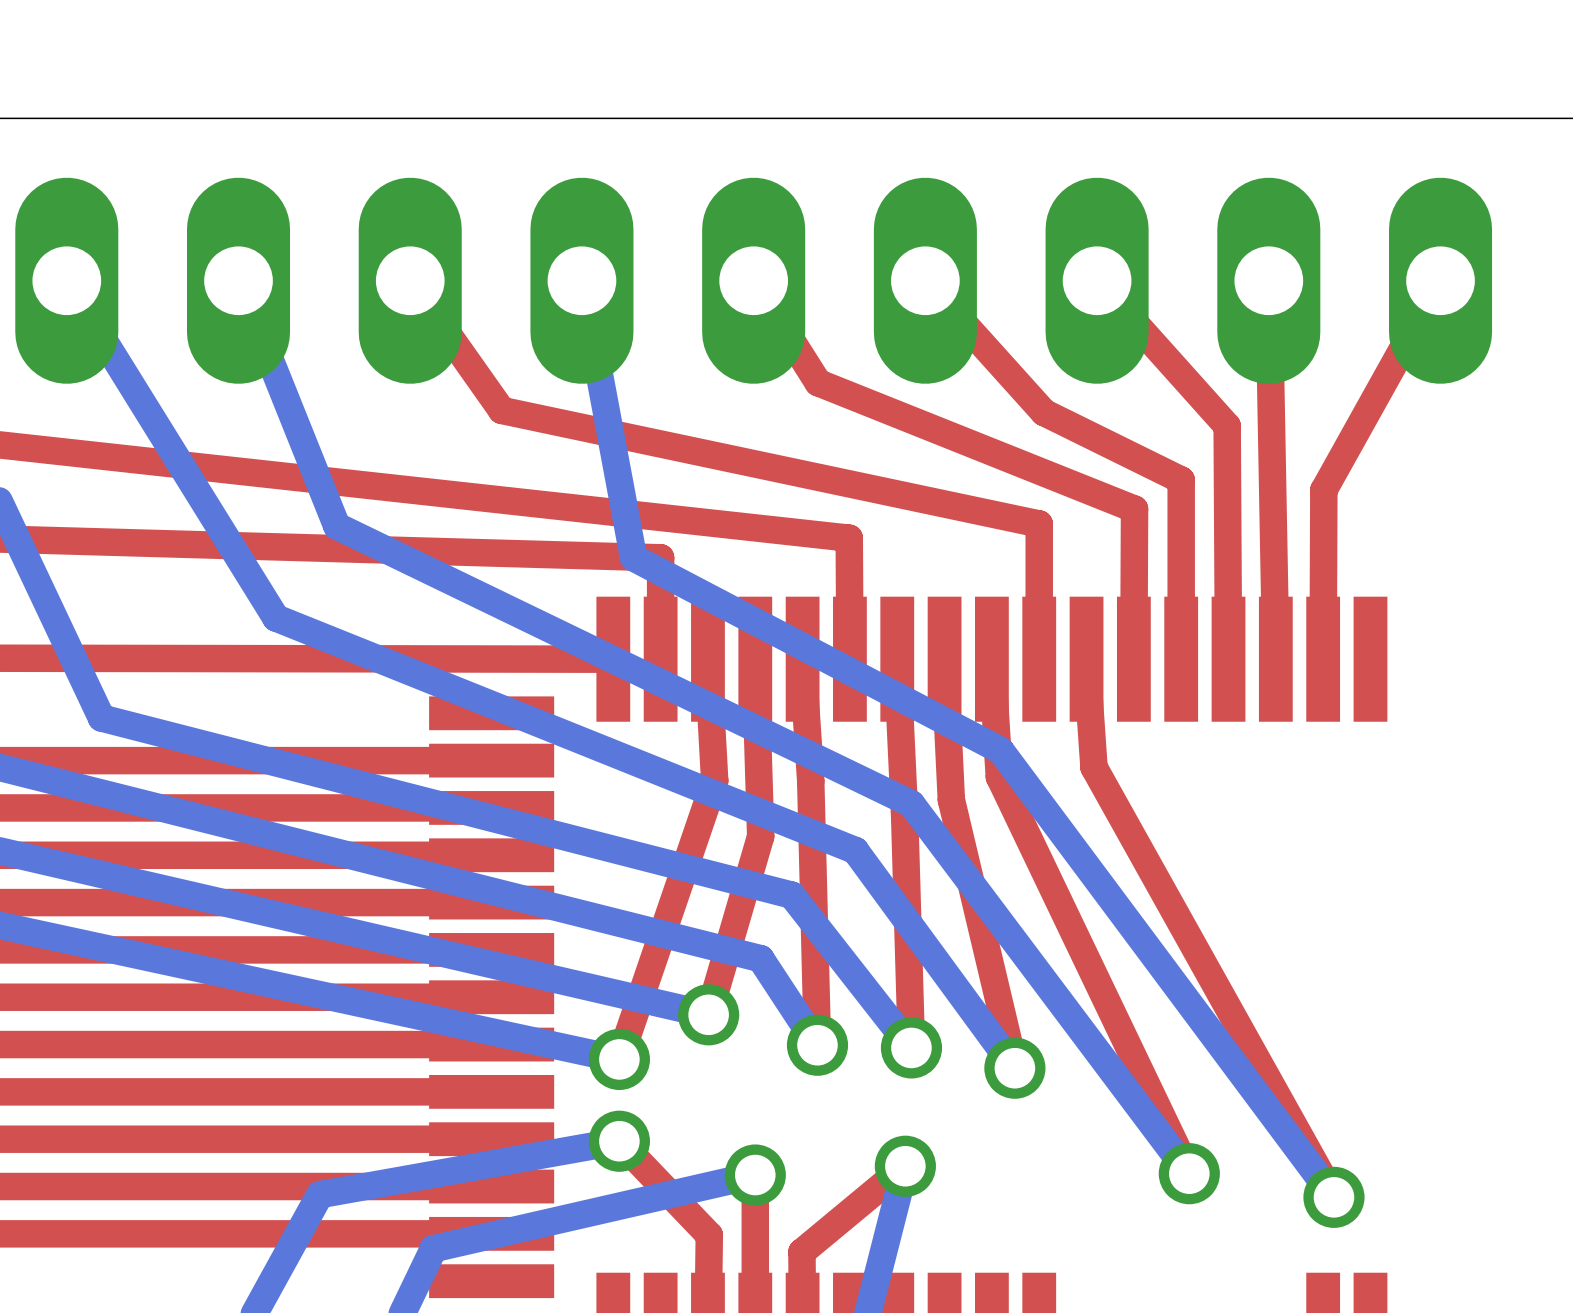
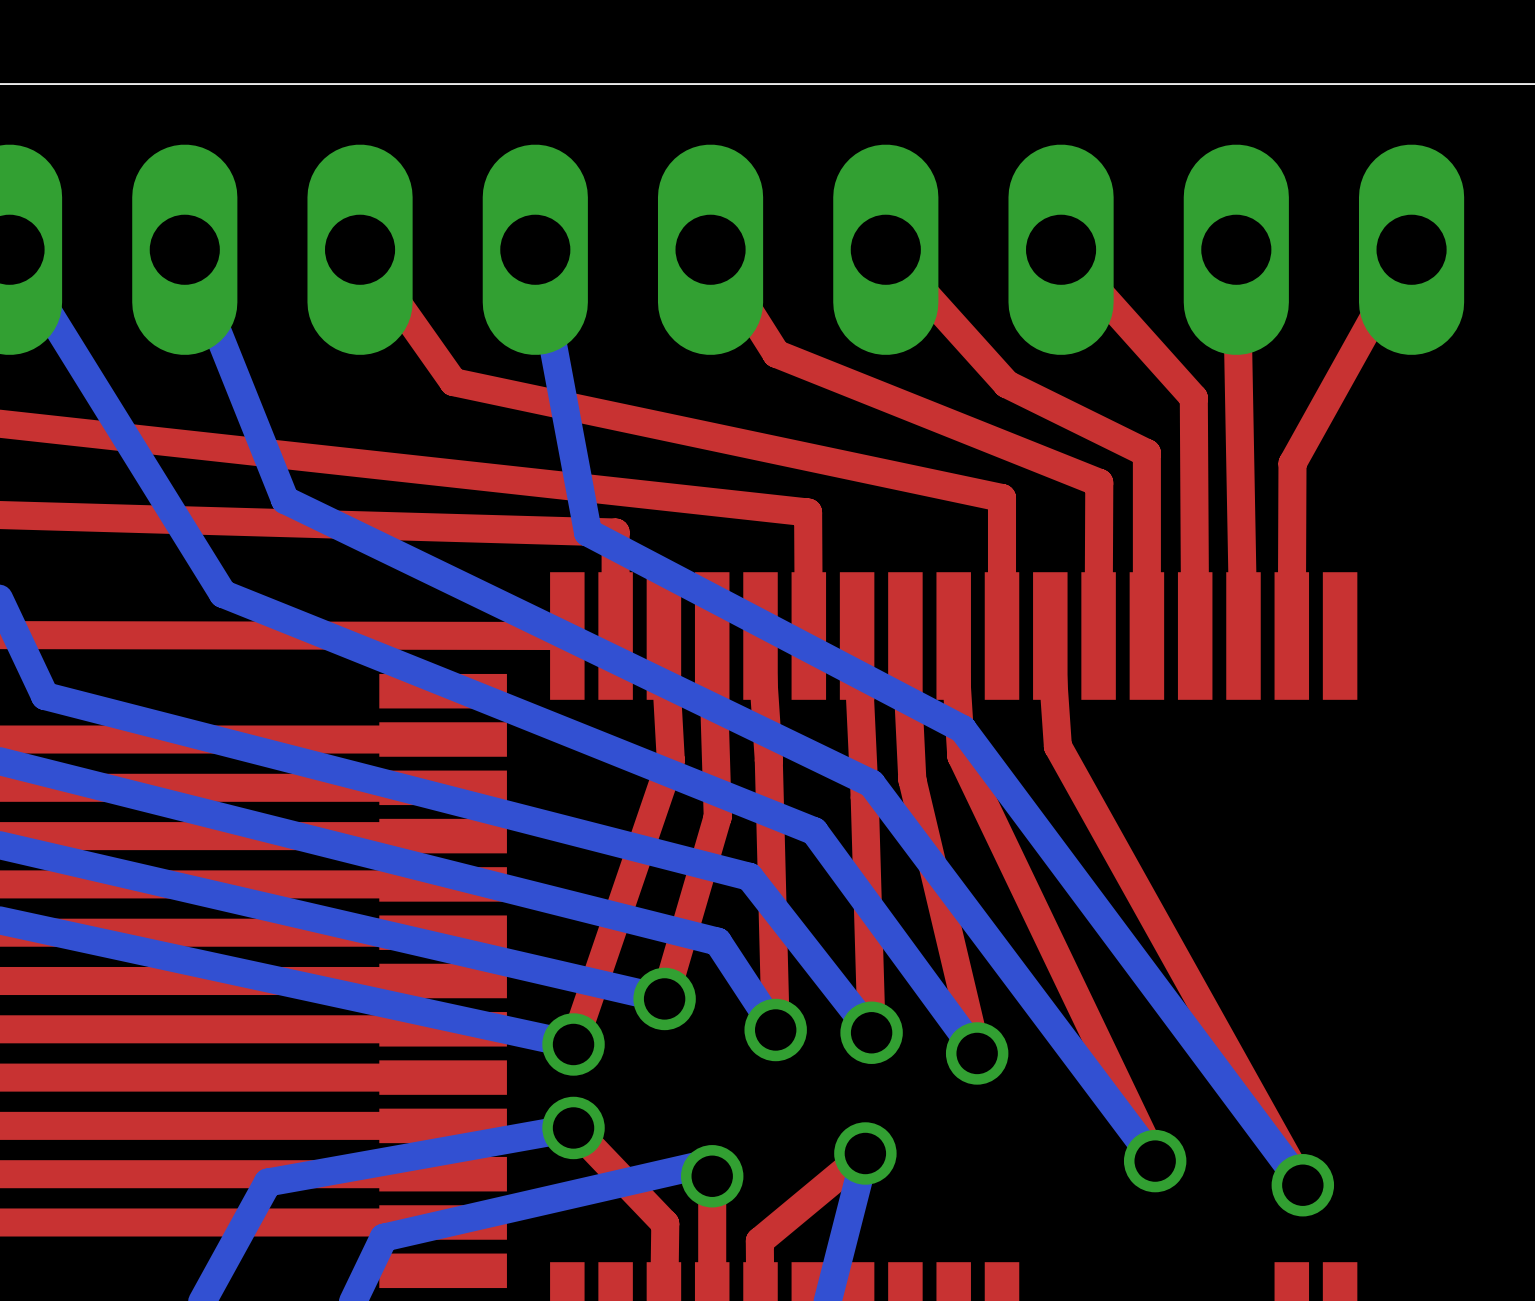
via position: (755, 1175) -> (712, 1176)

